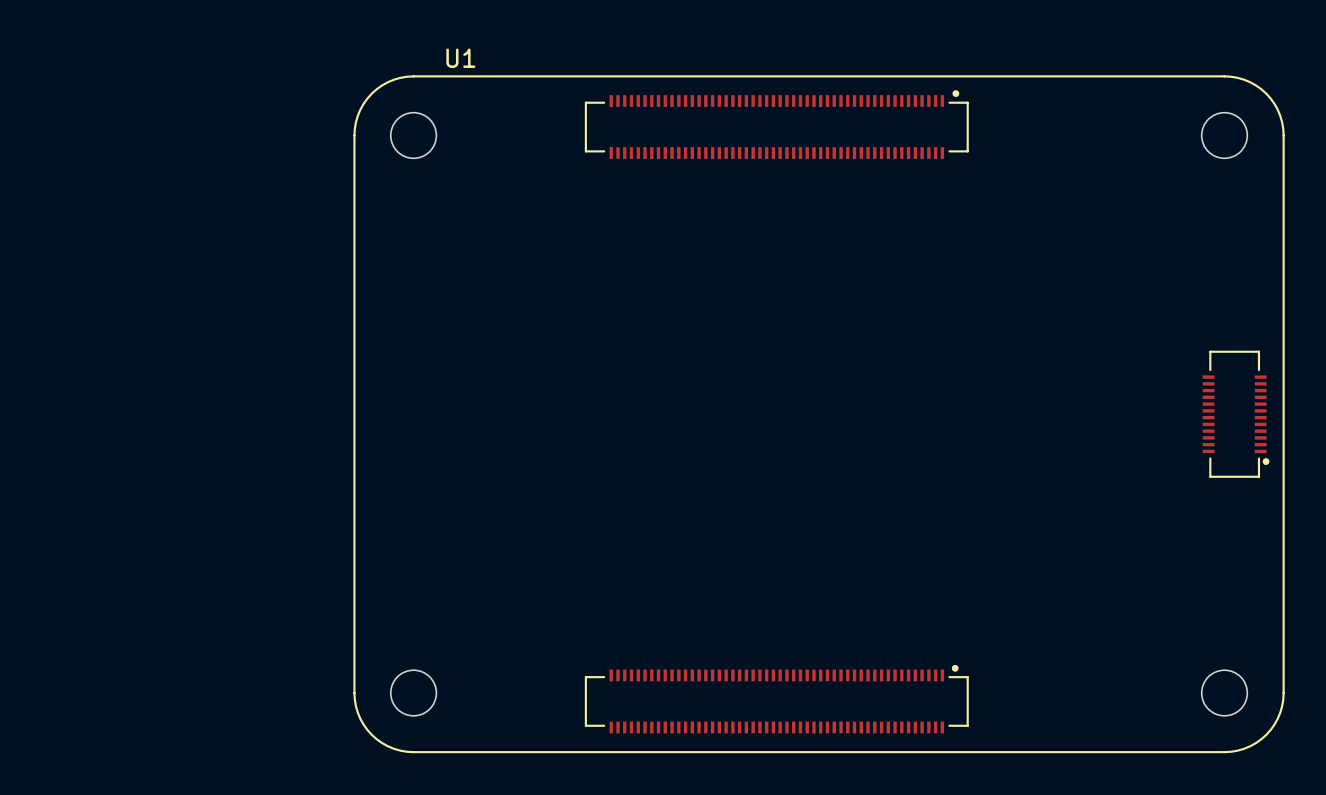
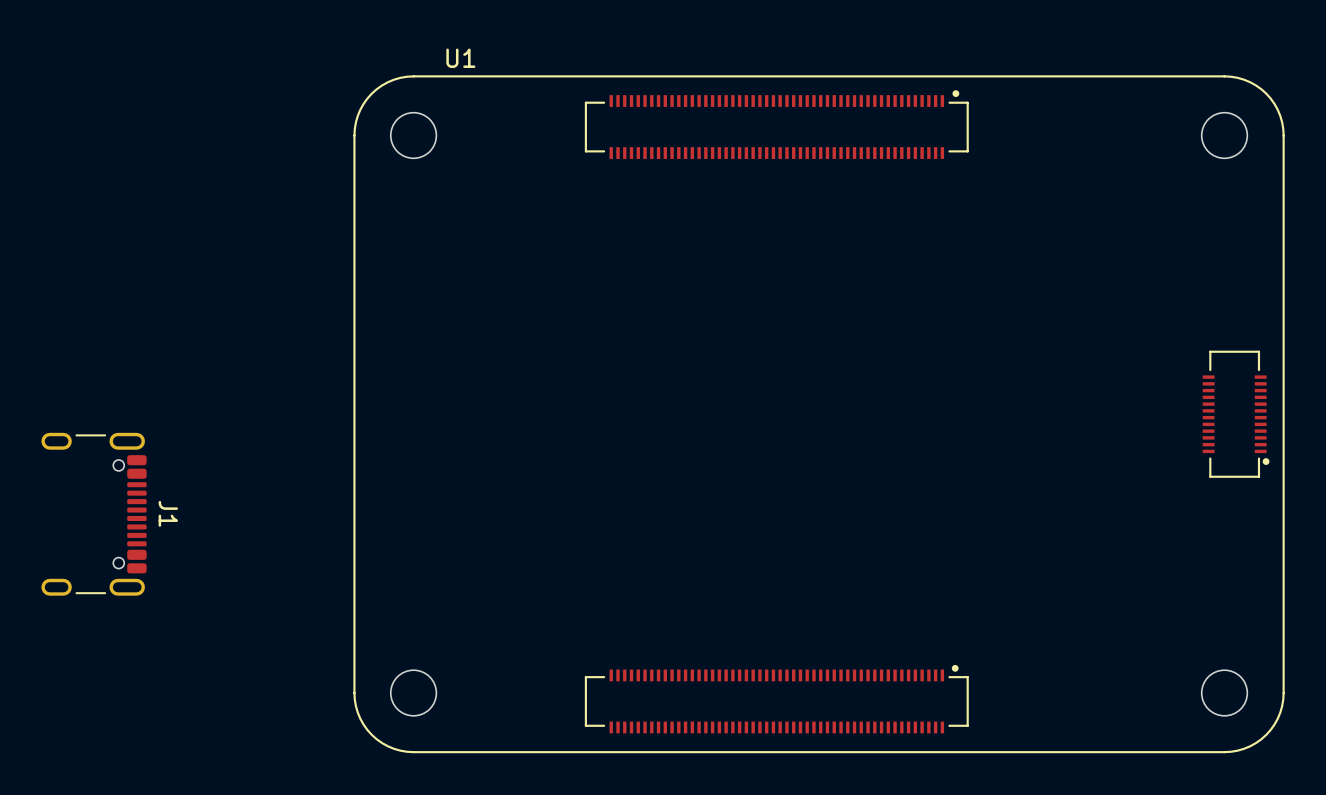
J1: none -> (94, 514)

